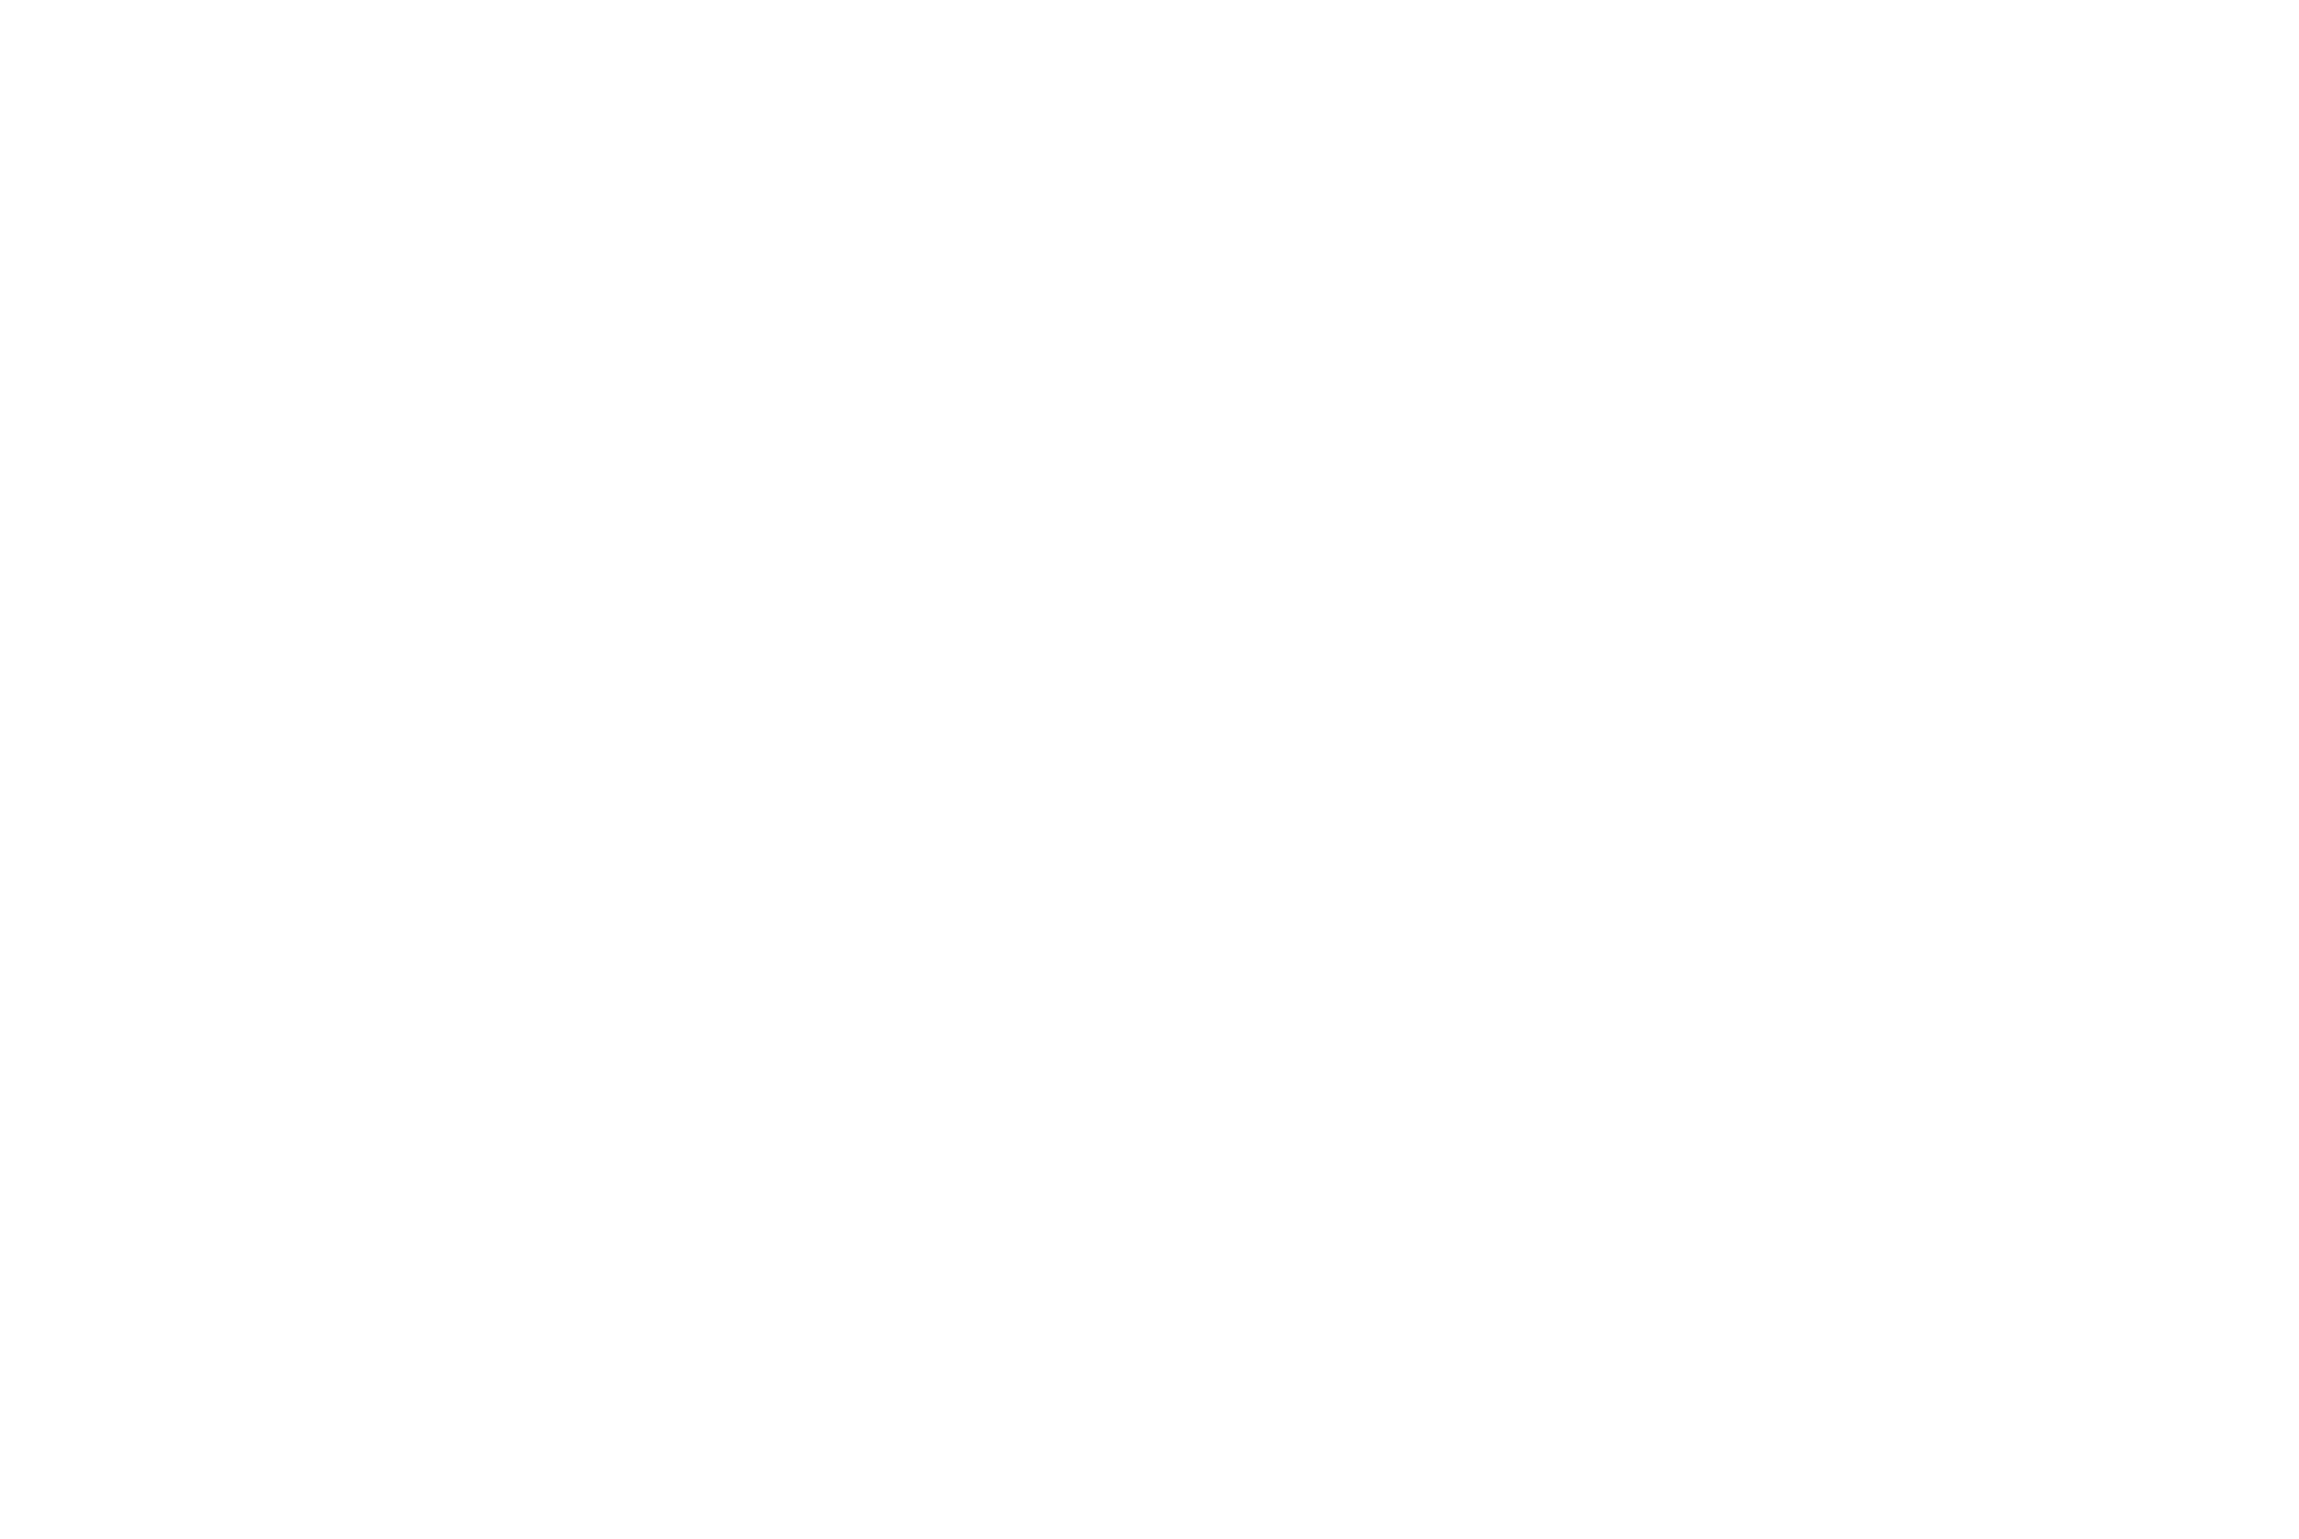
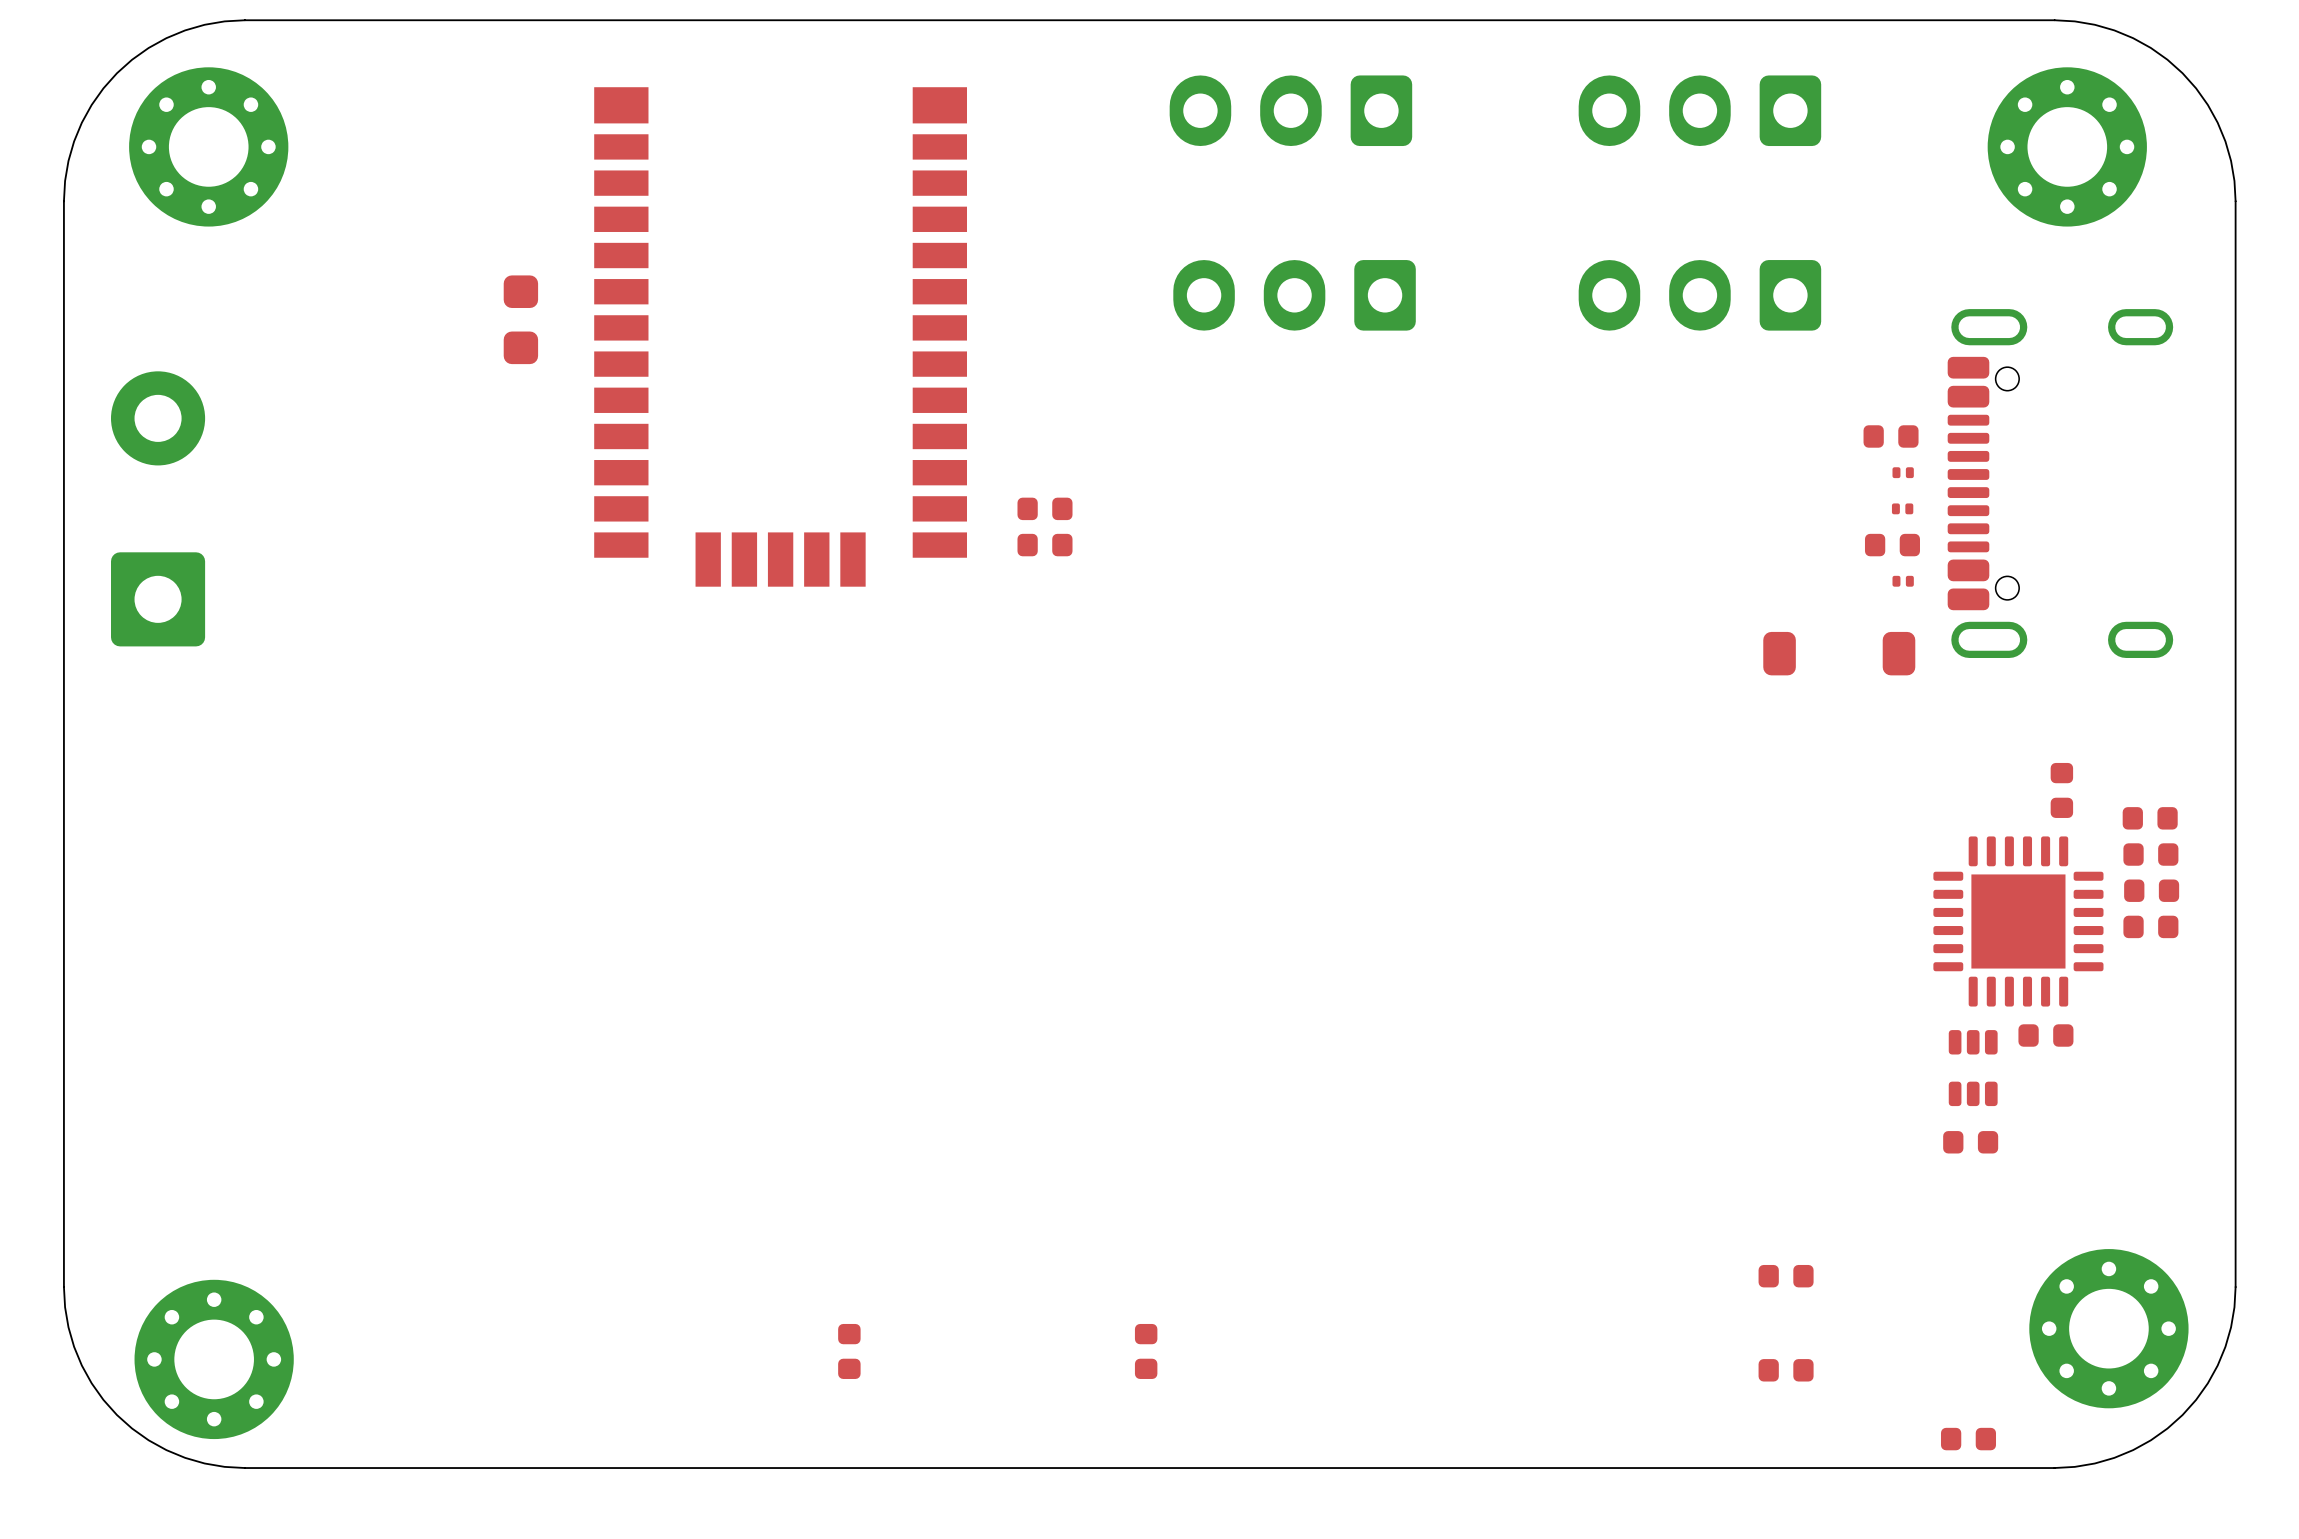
board edge: none -> (2054, 20) (244, 20) (224, 21) (185, 30) (148, 47) (116, 73) (103, 88) (81, 122) (68, 160) (63, 201) (63, 1287) (68, 1327) (74, 1346) (91, 1383) (116, 1415) (148, 1440) (185, 1457) (204, 1463) (244, 1468) (2054, 1468) (2074, 1466) (2114, 1457) (2150, 1440) (2182, 1415) (2207, 1383) (2225, 1346) (2234, 1307) (2234, 180) (2225, 141) (2207, 104) (2196, 88) (2167, 59) (2133, 38) (2114, 30) (2074, 21) (2054, 20)
part: none -> (1290, 110)
part: none -> (1699, 110)
part: none -> (208, 146)
part: none -> (2067, 146)
part: none -> (1294, 295)
part: none -> (1699, 295)
part: none -> (520, 319)
part: none -> (780, 336)
part: none -> (1891, 436)
part: none -> (1903, 472)
part: none -> (2060, 483)
part: none -> (158, 508)
part: none -> (1044, 508)
part: none -> (1902, 508)
part: none -> (1044, 545)
part: none -> (1892, 545)
part: none -> (1903, 581)
part: none -> (1839, 653)
part: none -> (2061, 790)
part: none -> (2150, 818)
part: none -> (2150, 854)
part: none -> (2151, 890)
part: none -> (2018, 921)
part: none -> (2150, 926)
part: none -> (2045, 1035)
part: none -> (1973, 1068)
part: none -> (1970, 1142)
part: none -> (1786, 1276)
part: none -> (2108, 1328)
part: none -> (849, 1351)
part: none -> (1146, 1351)
part: none -> (214, 1359)
part: none -> (1786, 1370)
part: none -> (1968, 1439)

